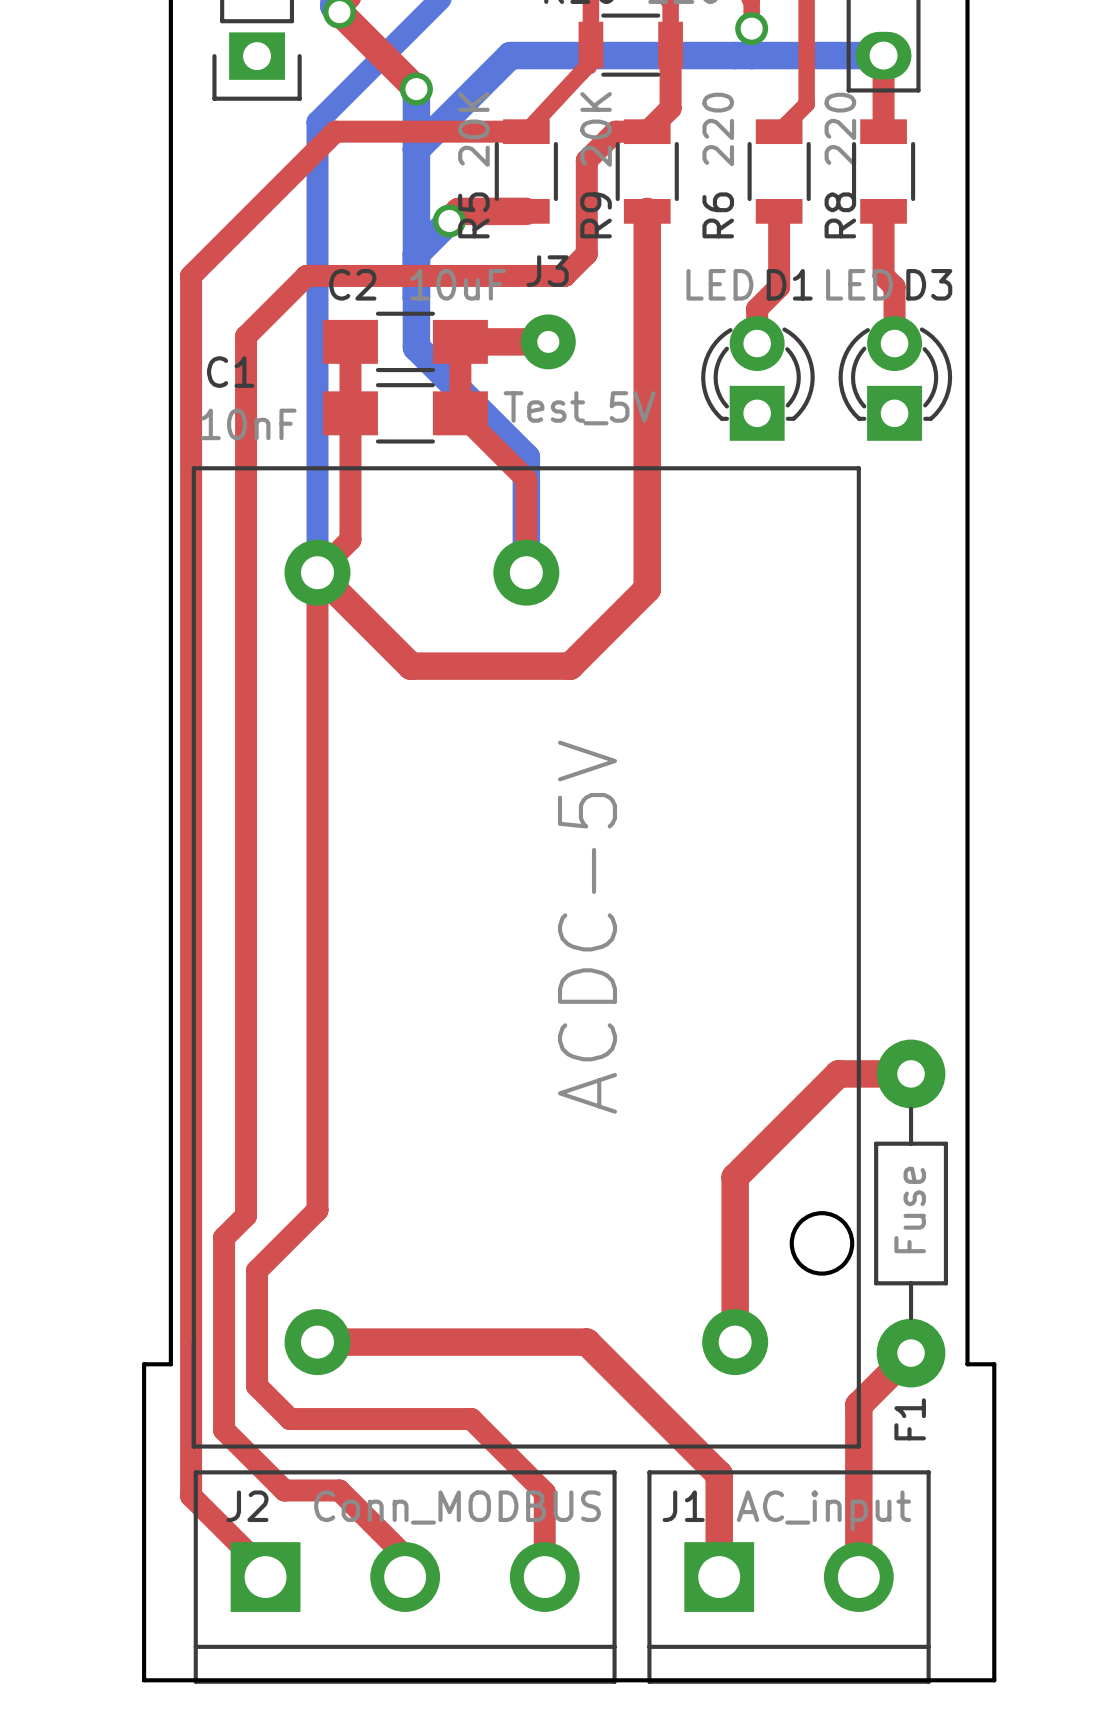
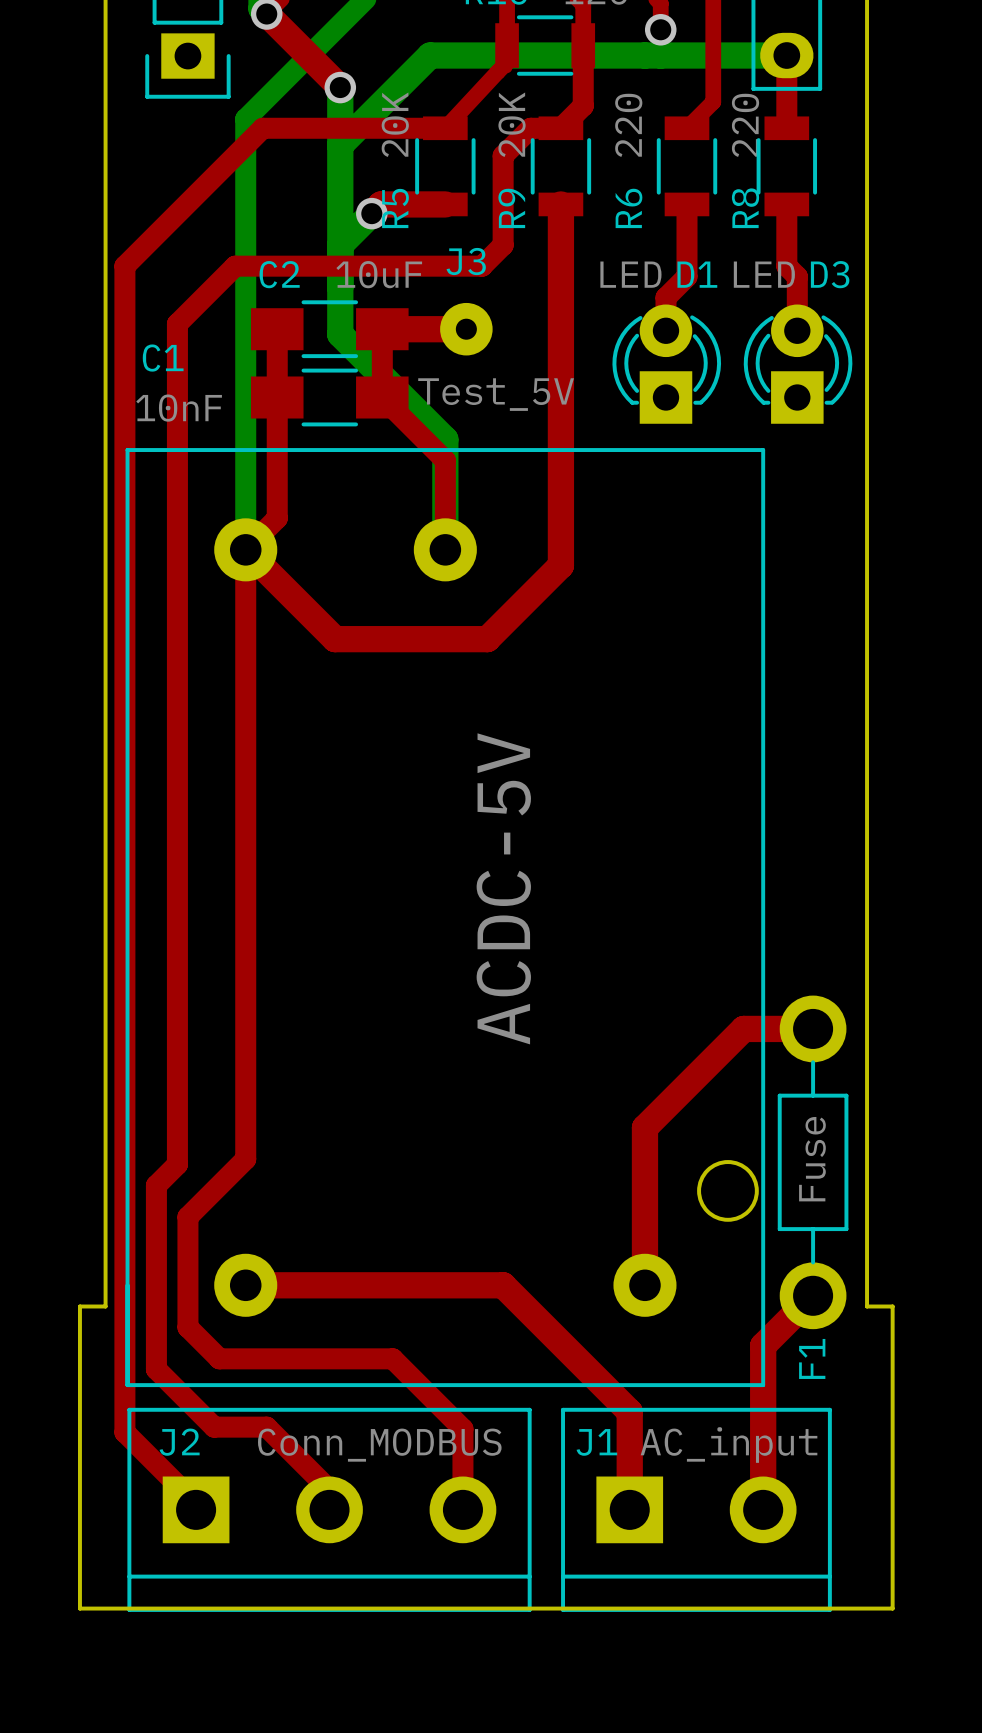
F1 footprint: [874, 1039, 949, 1388] -> [777, 995, 849, 1330]

